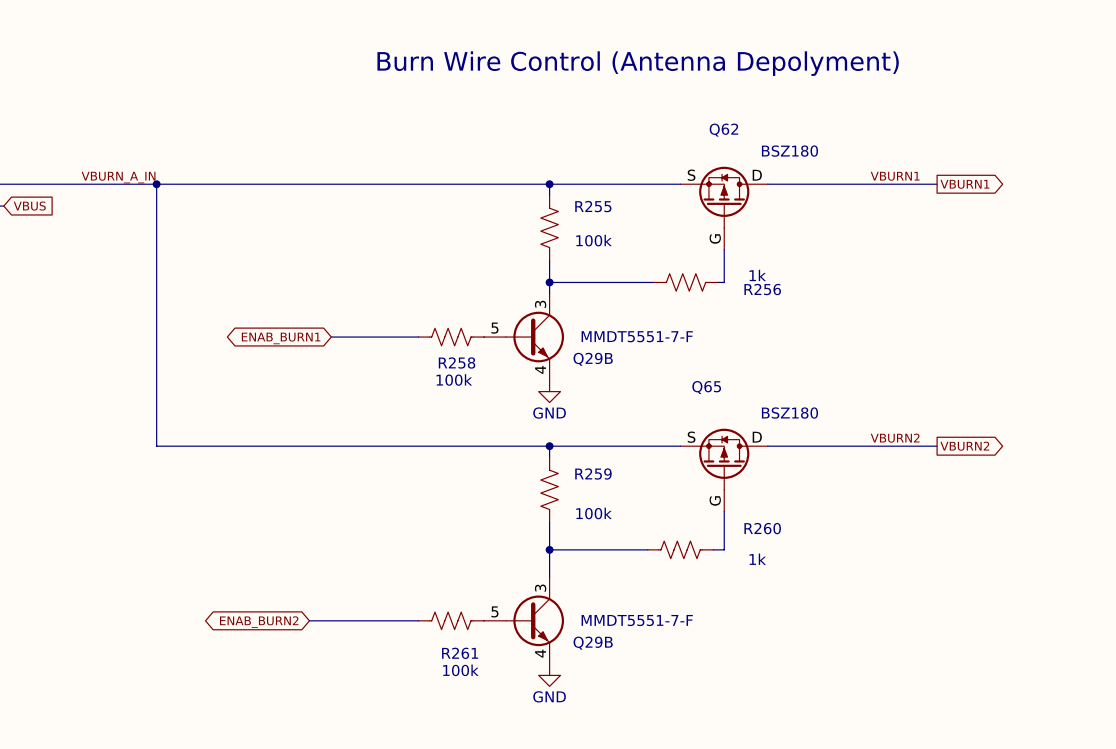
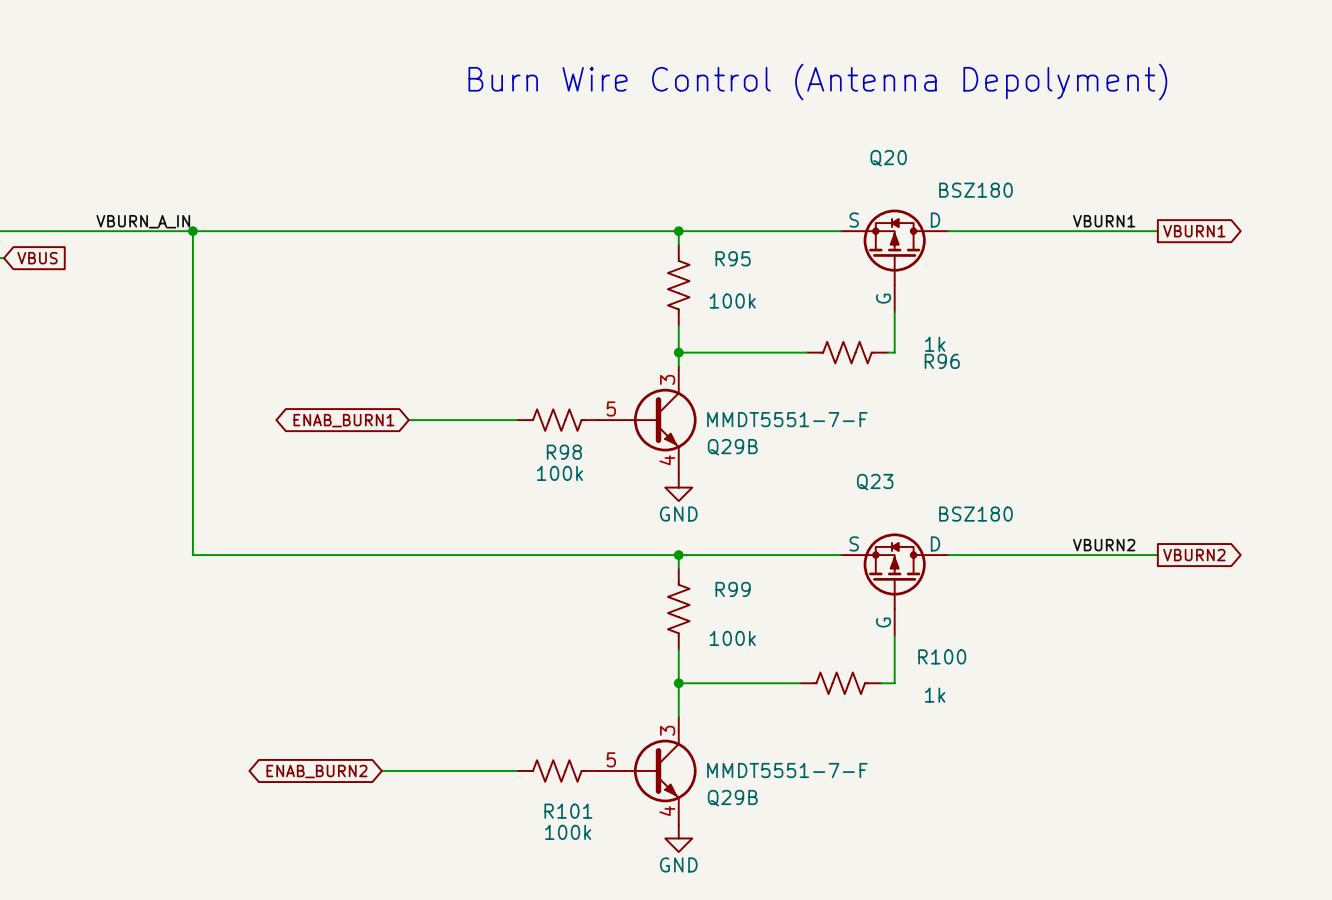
Q62 name: Q62 (723, 130) -> Q20 (888, 158)
R255 name: R255 (593, 206) -> R95 (733, 258)
R256 name: R256 (762, 289) -> R96 (942, 361)
R258 name: R258 (457, 362) -> R98 (564, 452)
Q65 name: Q65 (706, 387) -> Q23 (875, 482)
R259 name: R259 (593, 474) -> R99 (733, 589)
R260 name: R260 (762, 528) -> R100 (942, 656)
R261 name: R261 (460, 653) -> R101 (568, 811)

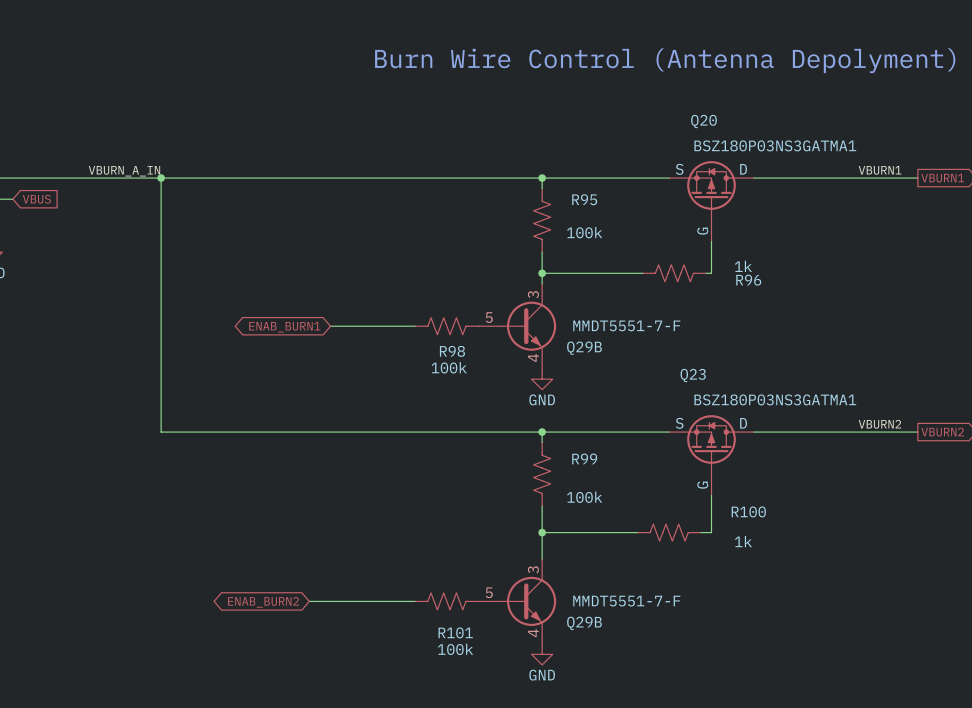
Q20 value: BSZ180 (975, 190) -> BSZ180P03NS3GATMA1 (775, 145)
Q23 value: BSZ180 (975, 514) -> BSZ180P03NS3GATMA1 (775, 399)

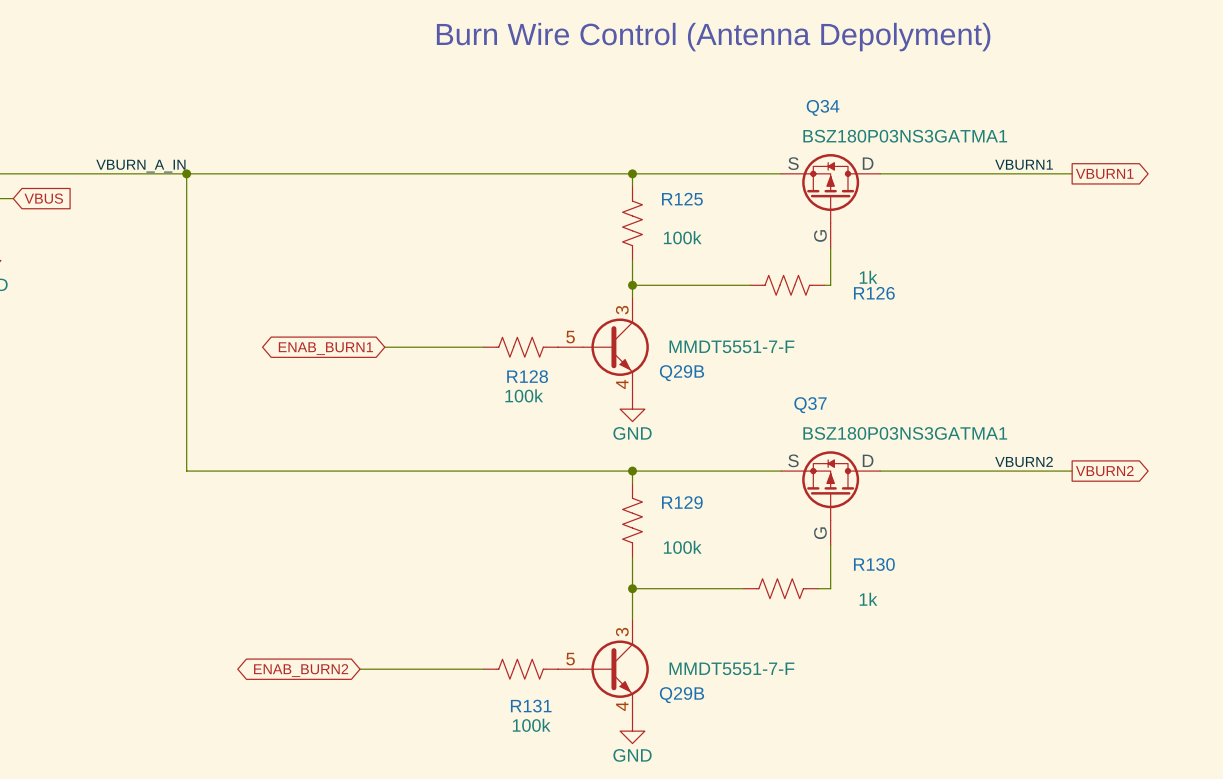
Q20 name: Q20 (703, 121) -> Q34 (823, 107)
R95 name: R95 (584, 199) -> R125 (682, 199)
R96 name: R96 (748, 280) -> R126 (874, 293)
R98 name: R98 (452, 351) -> R128 (527, 376)
Q23 name: Q23 (693, 375) -> Q37 (810, 405)
R99 name: R99 (584, 458) -> R129 (682, 502)
R100 name: R100 (748, 511) -> R130 (874, 564)
R101 name: R101 (455, 632) -> R131 (531, 706)

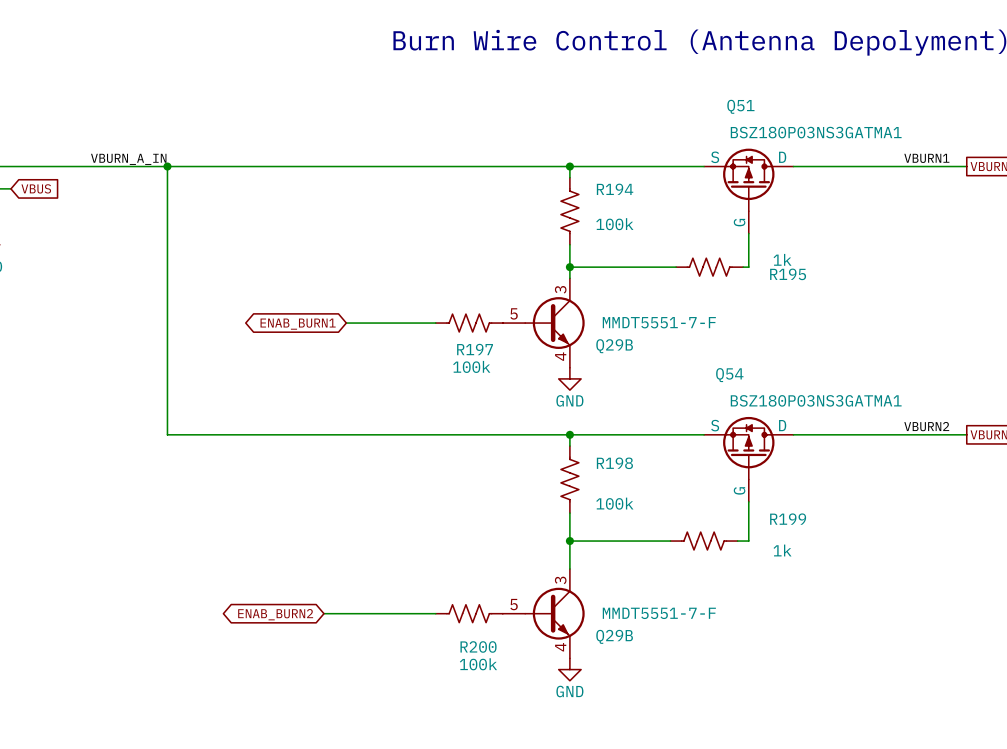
Q34 name: Q34 (823, 107) -> Q51 (740, 106)
R125 name: R125 (682, 199) -> R194 (615, 189)
R126 name: R126 (874, 293) -> R195 (788, 274)
R128 name: R128 (527, 376) -> R197 (475, 349)
Q37 name: Q37 (810, 405) -> Q54 (729, 375)
R129 name: R129 (682, 502) -> R198 (614, 463)
R130 name: R130 (874, 564) -> R199 (788, 519)
R131 name: R131 (531, 706) -> R200 (478, 646)

